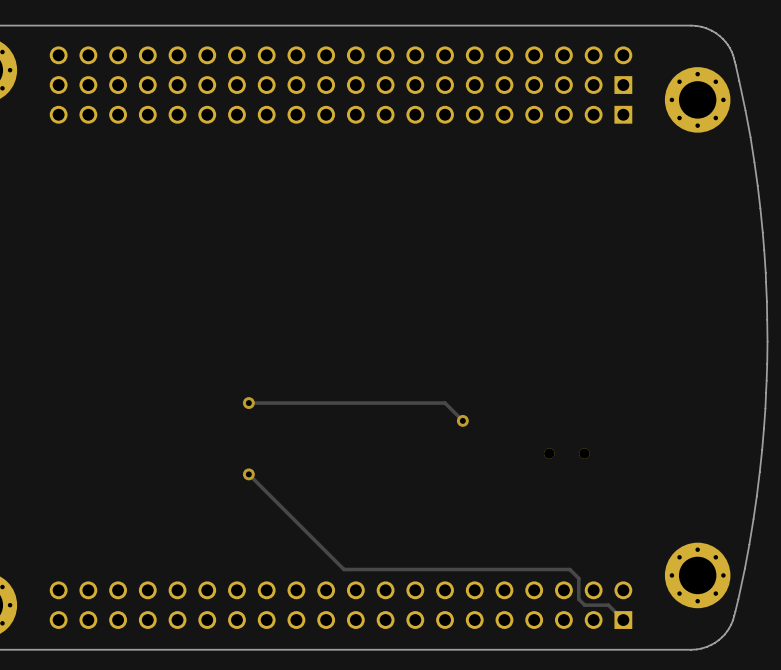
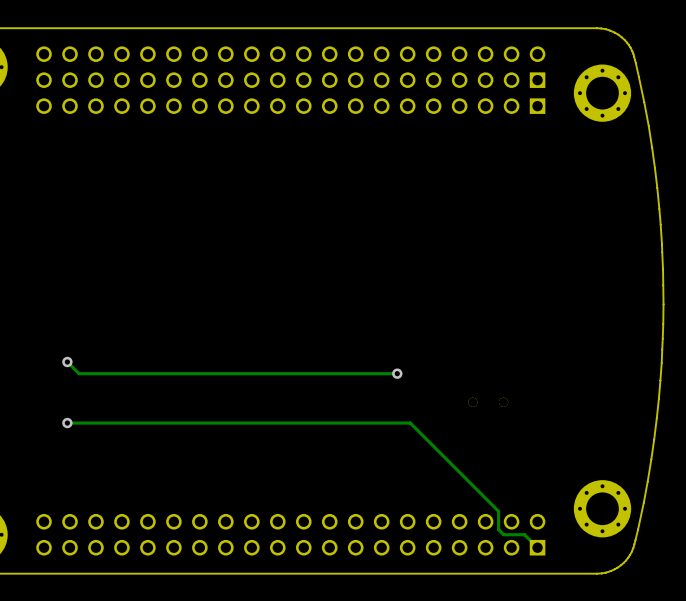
track: (248, 403) (445, 403) (462, 420) -> (67, 362) (79, 373) (397, 373)
via: (248, 403) -> none
via: none -> (67, 362)
track: (248, 474) (343, 569) (569, 569) -> (67, 423) (410, 423) (490, 503)
via: (248, 474) -> none
via: none -> (67, 423)

